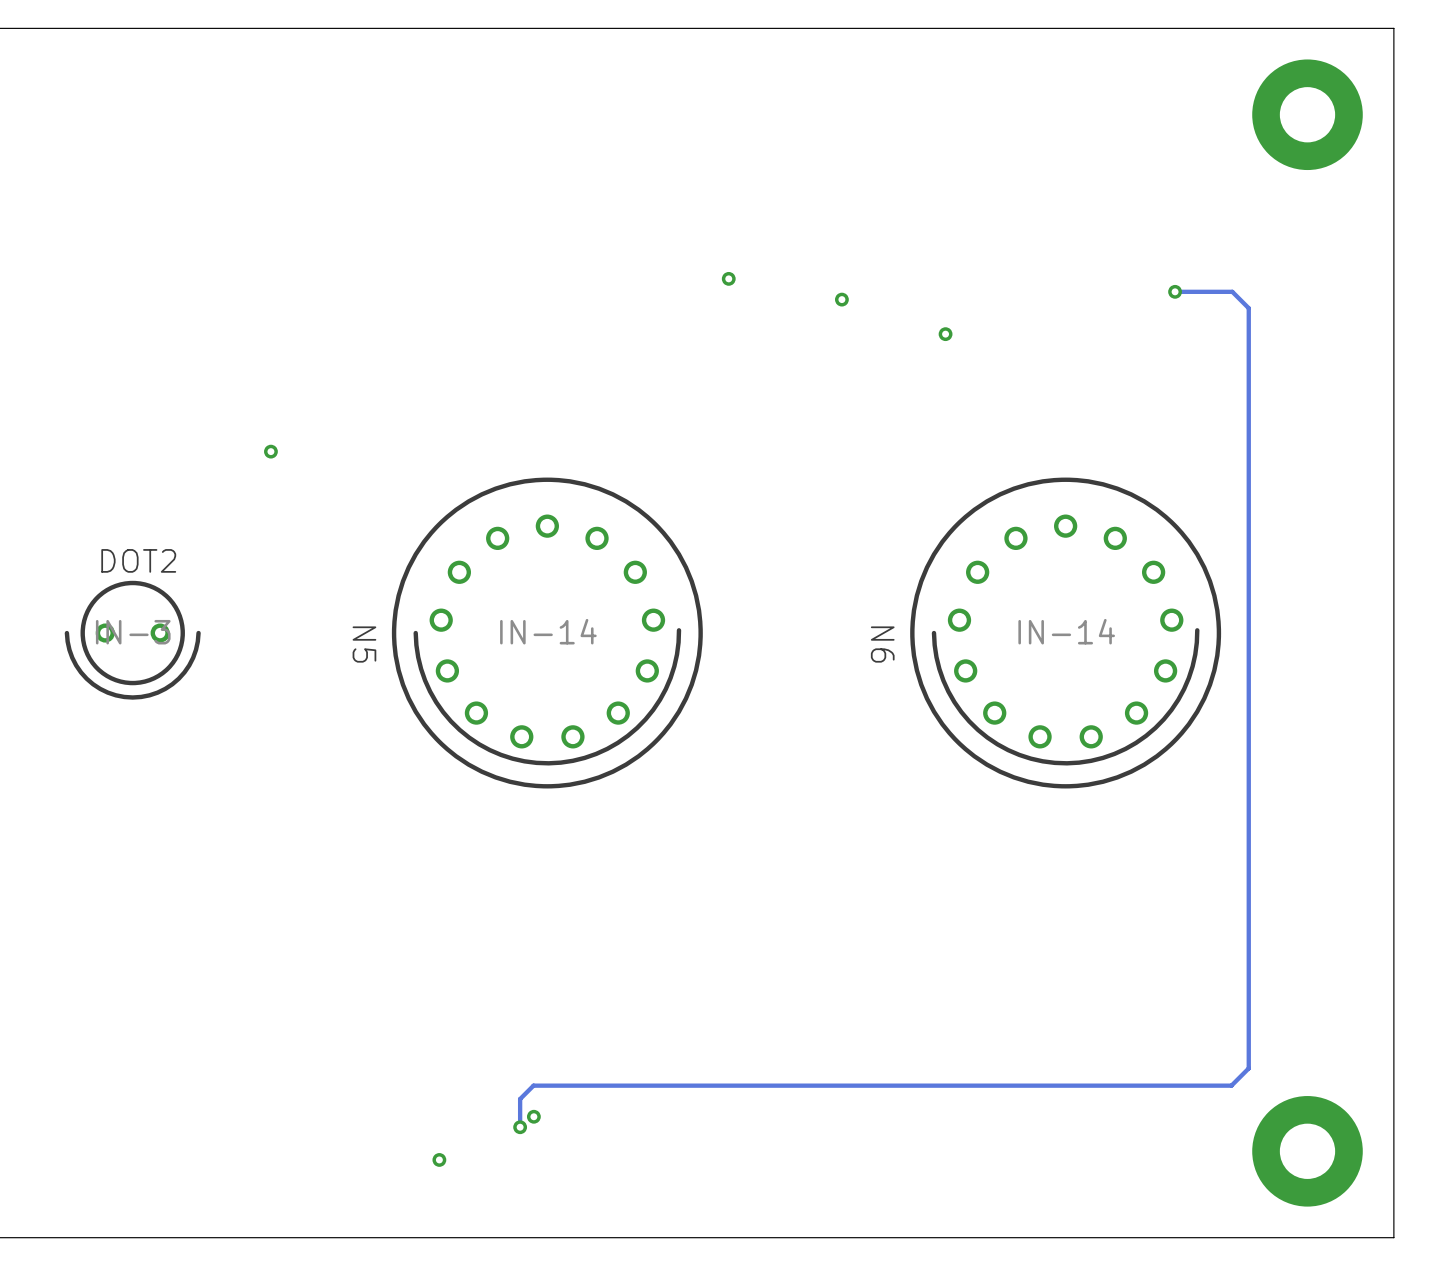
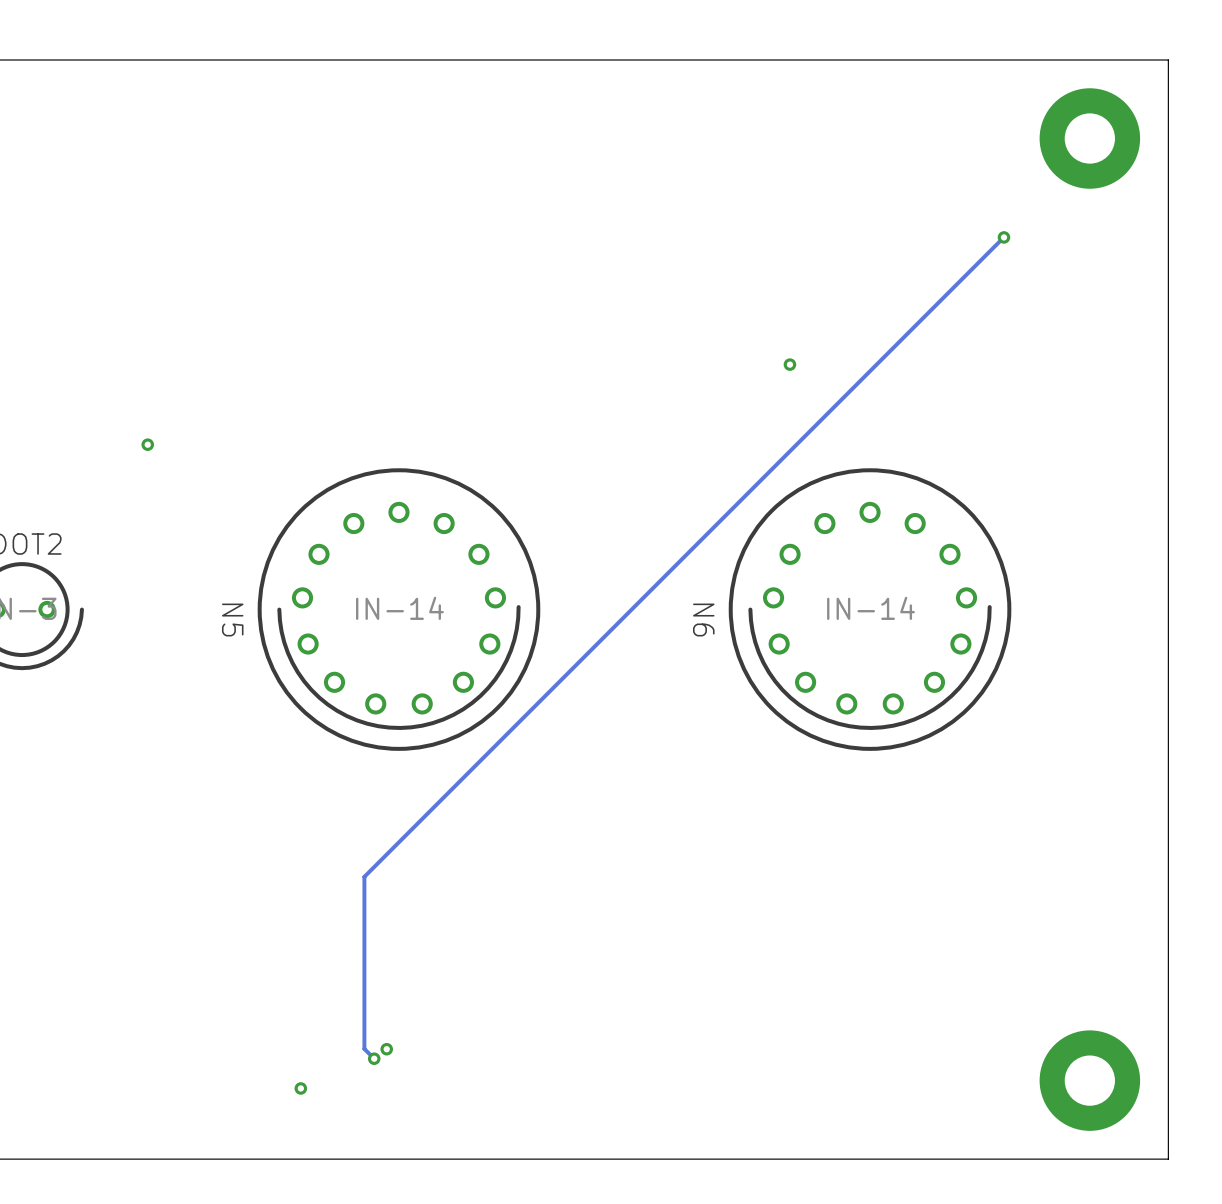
via: (728, 278) -> none
track: (1175, 291) (1232, 291) (1248, 308) (1248, 1068) (1231, 1085) (533, 1085) (520, 1099) (520, 1127) -> (1003, 237) (364, 876) (364, 1048) (374, 1058)
via position: (1175, 291) -> (1003, 237)
via: (841, 299) -> none
via position: (945, 334) -> (789, 364)

